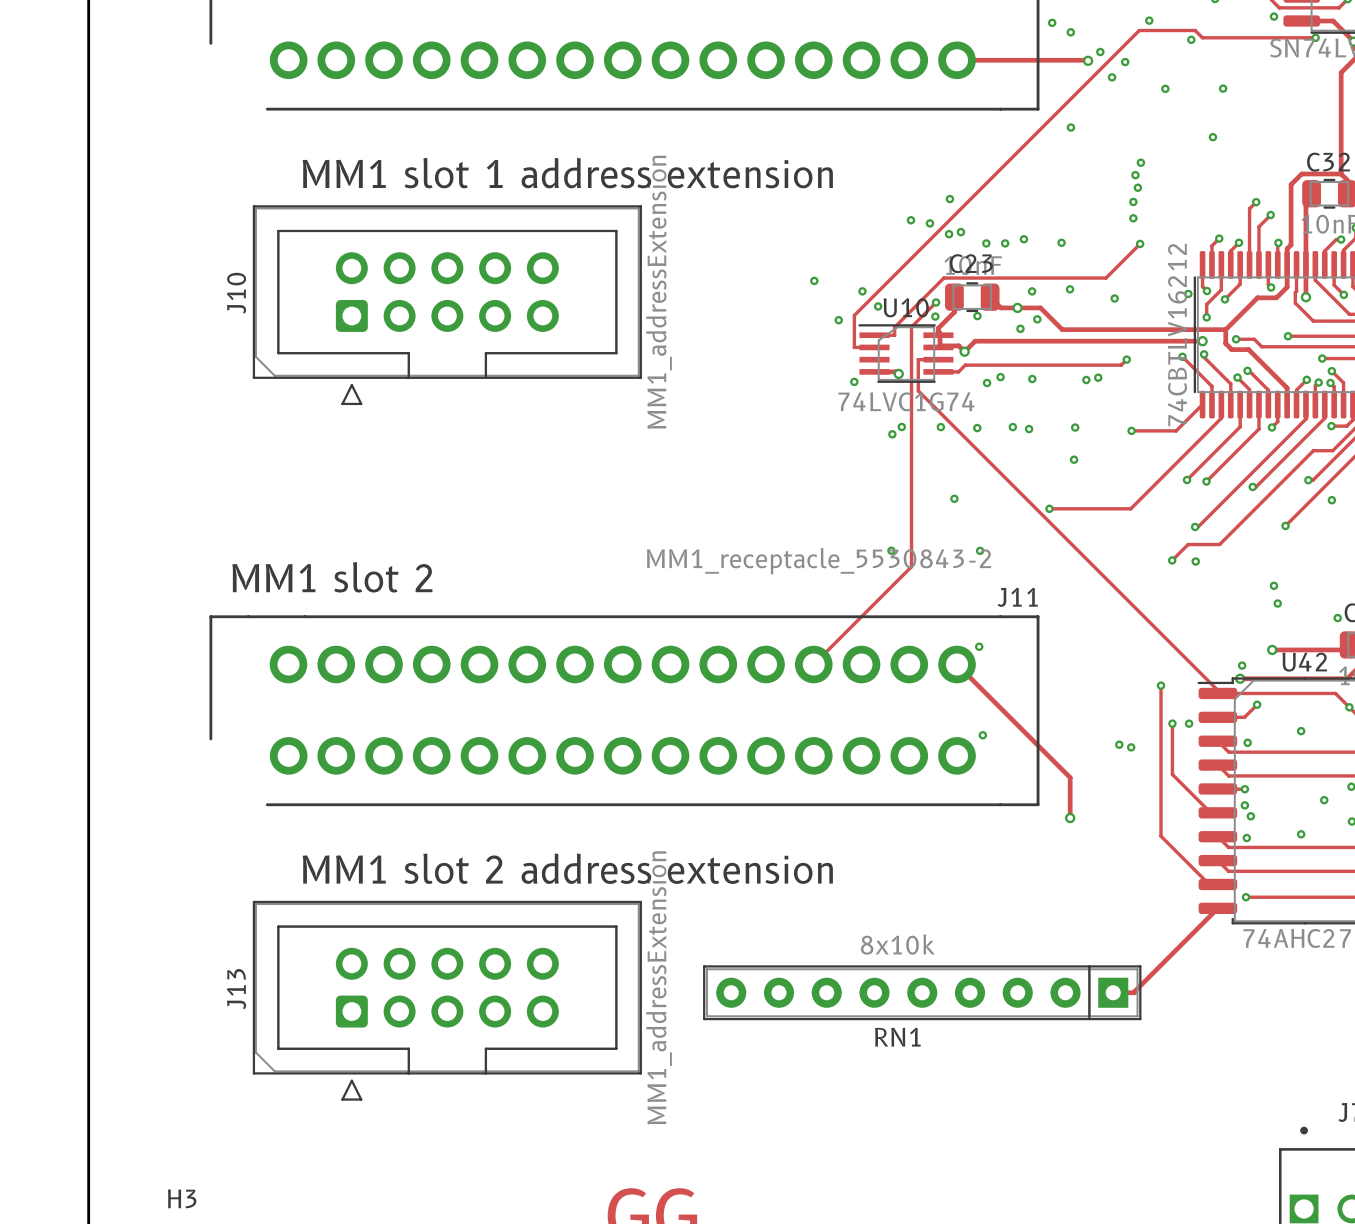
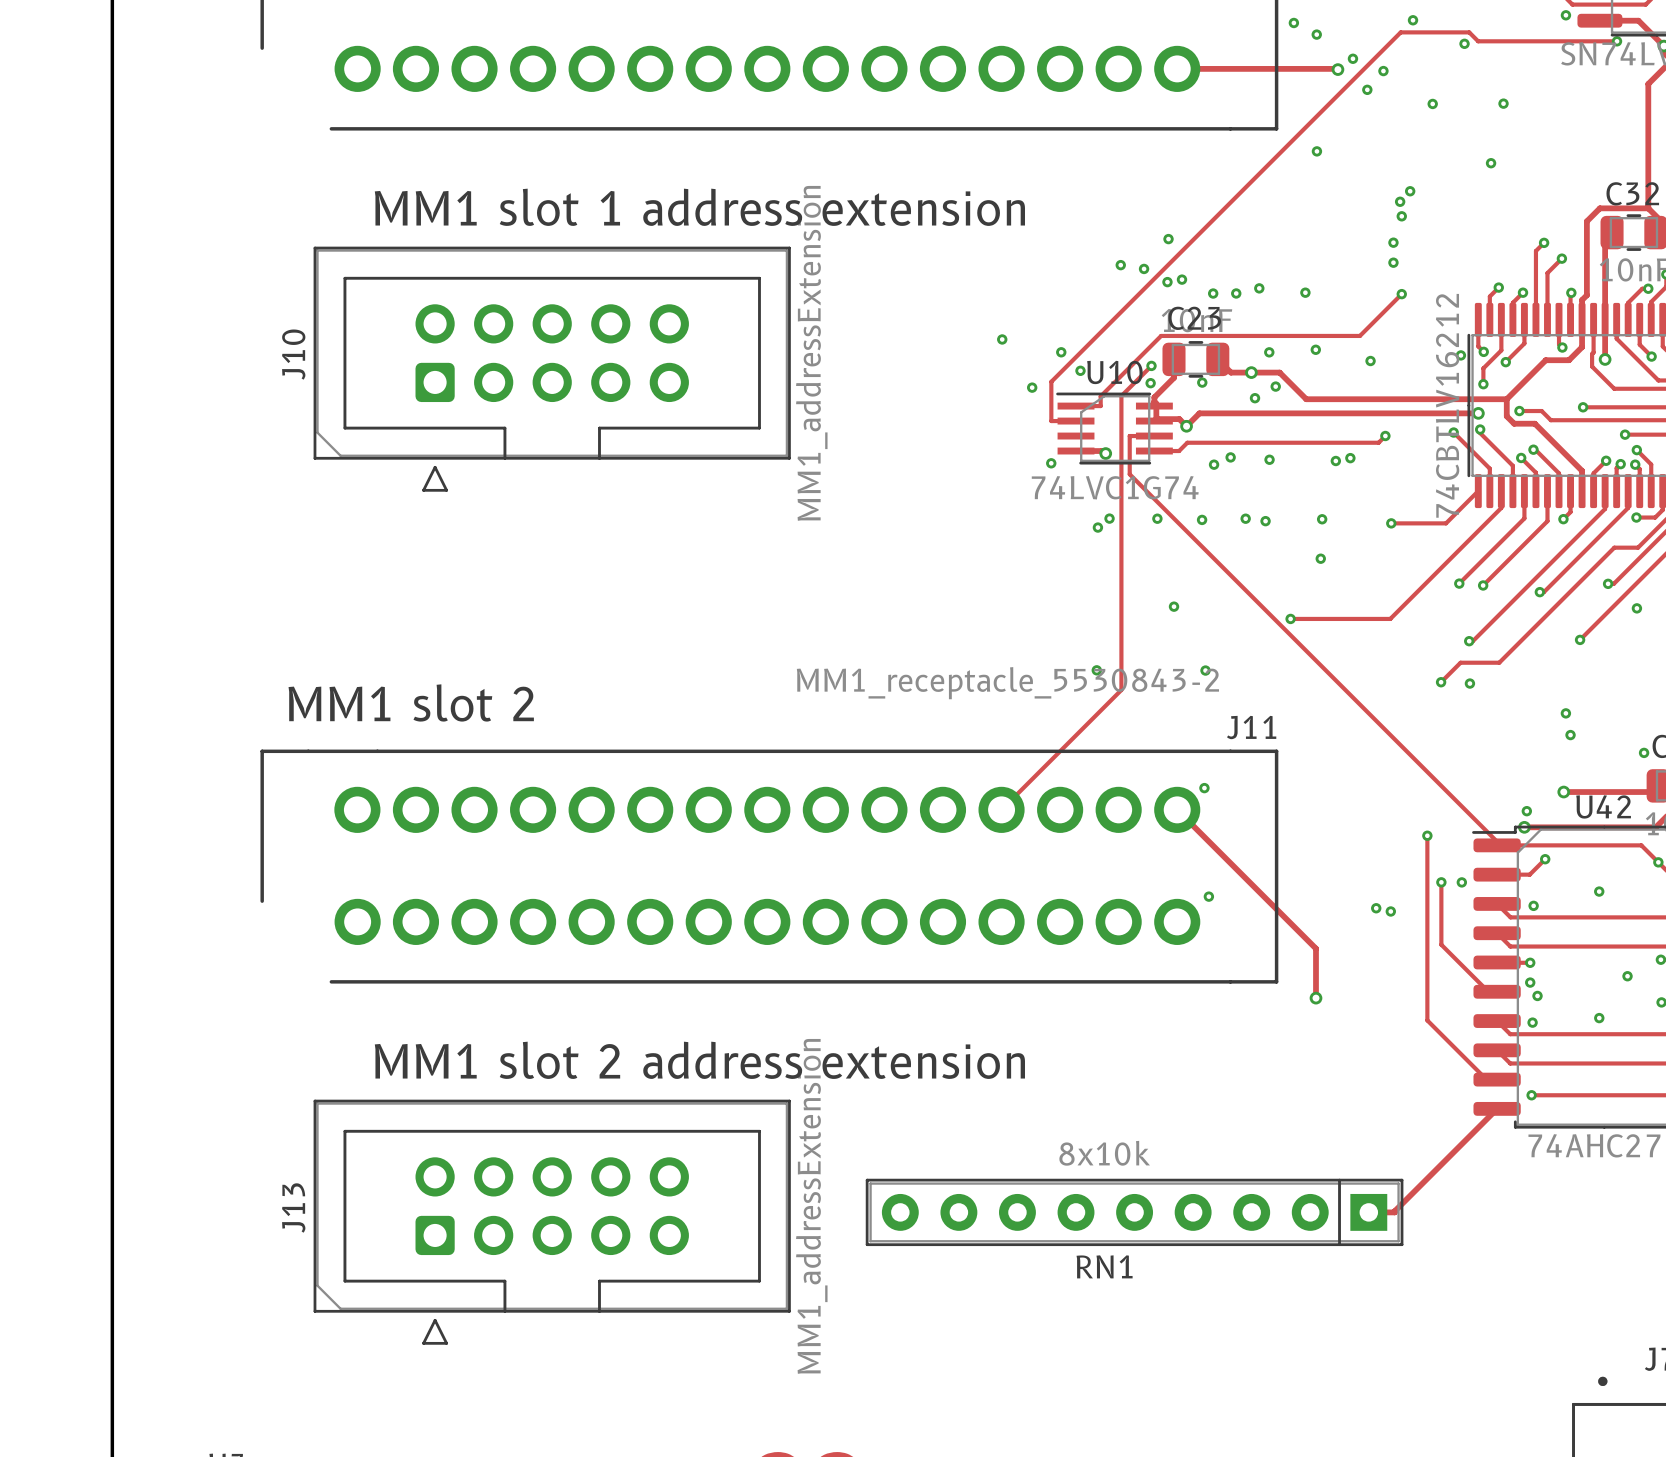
via: none -> (1410, 191)
via: (1140, 162) -> none
via: none -> (1400, 201)
via: (1135, 175) -> none
via: none -> (1401, 216)
via: (1137, 187) -> none

